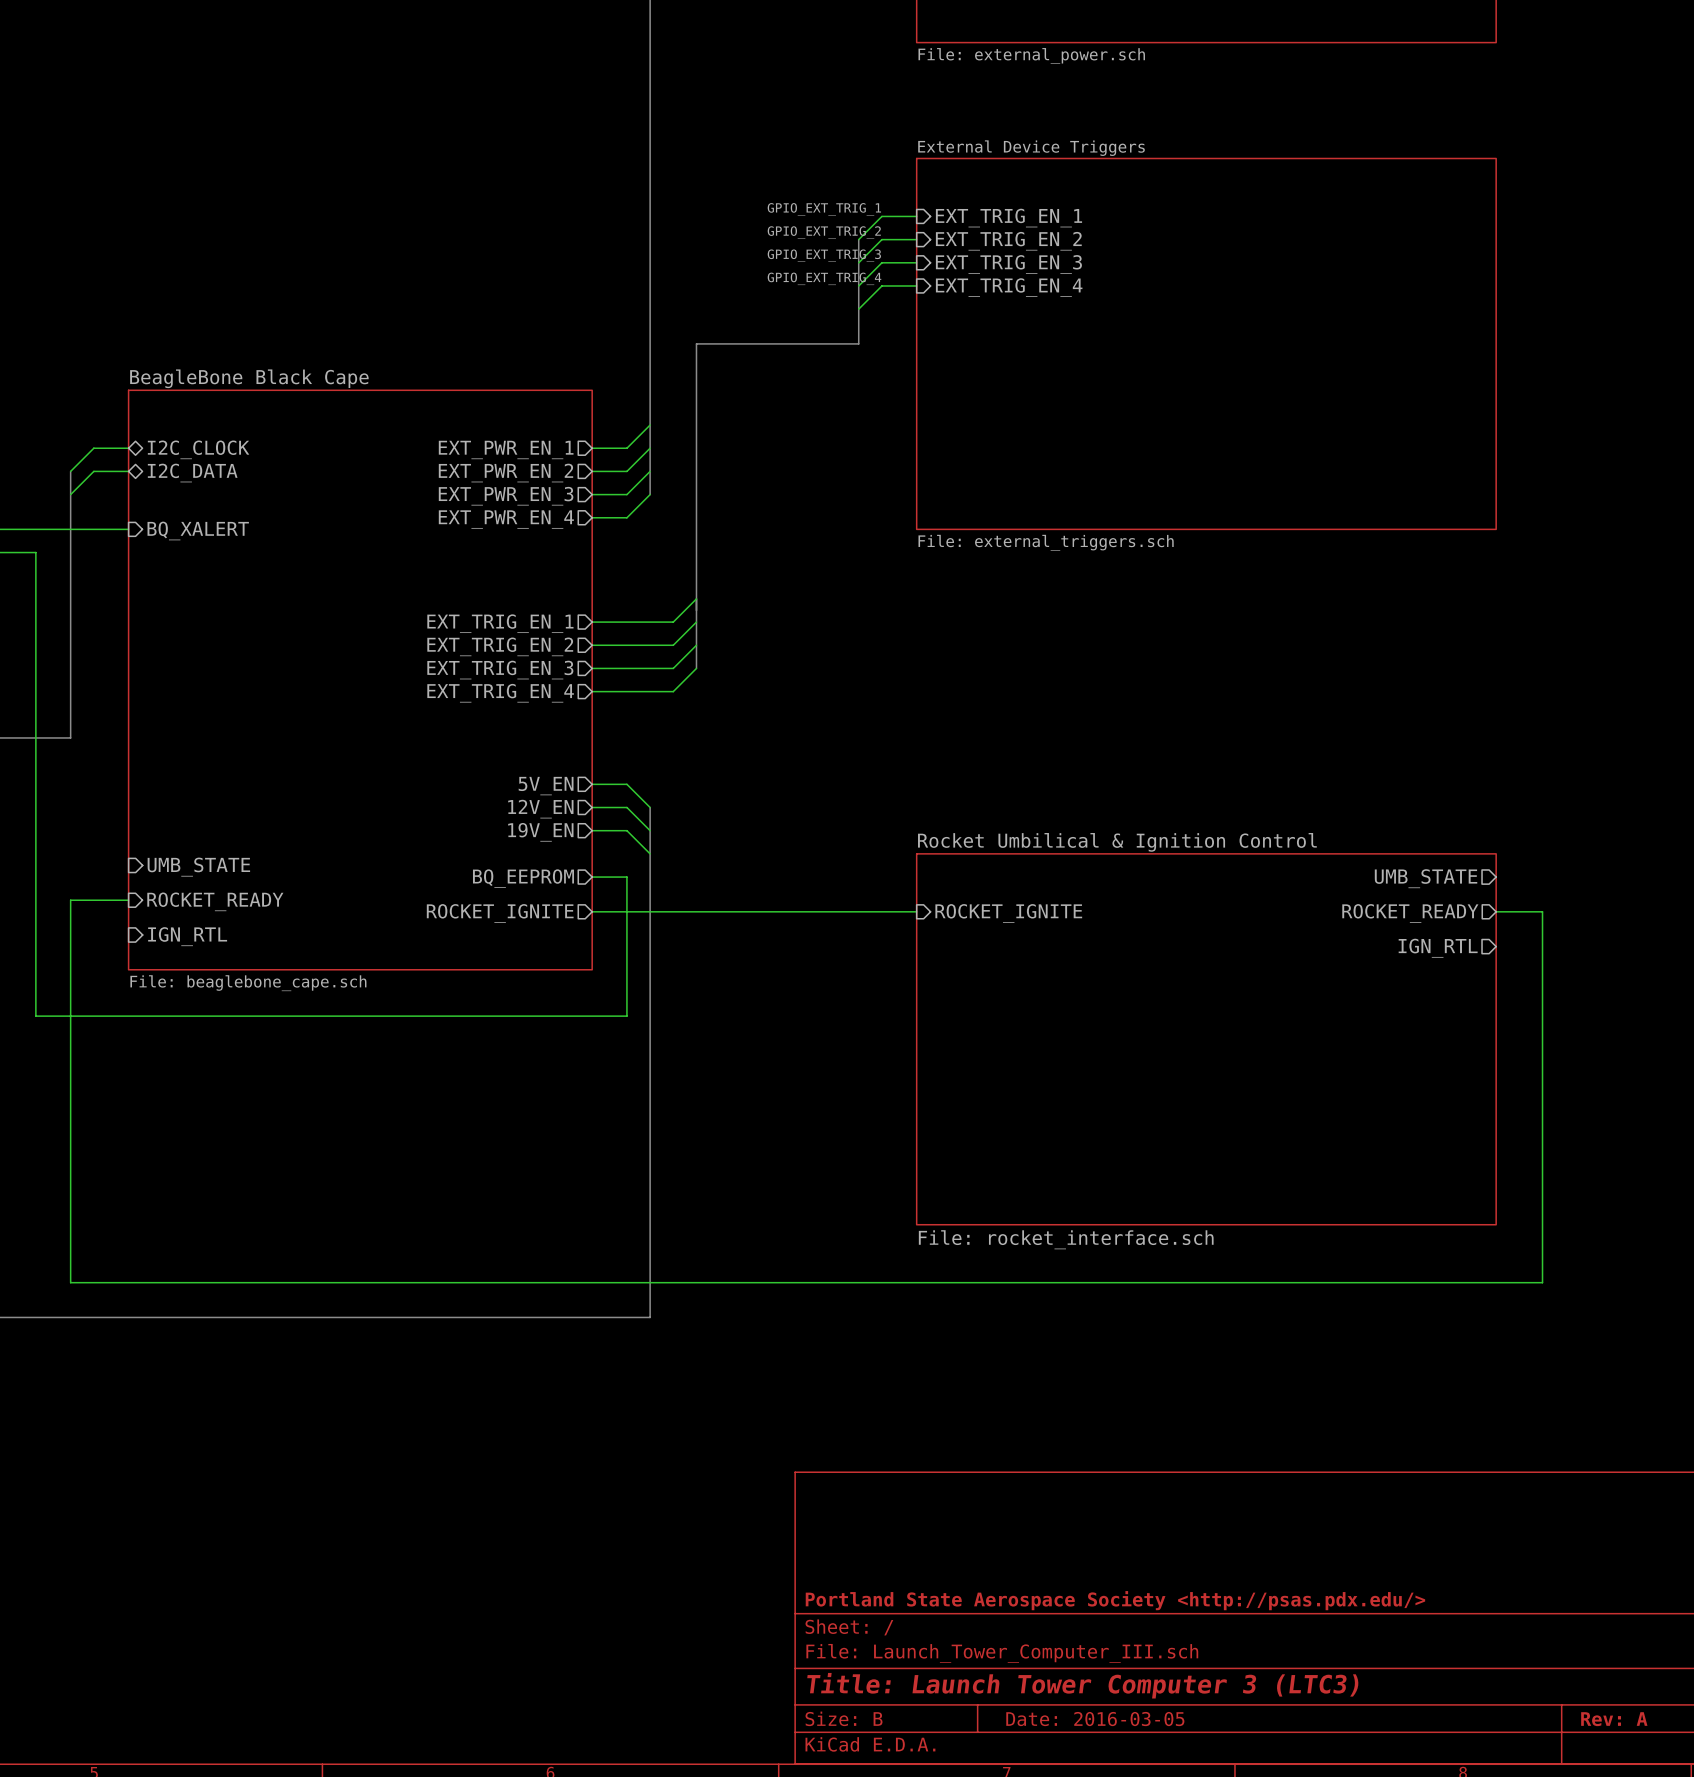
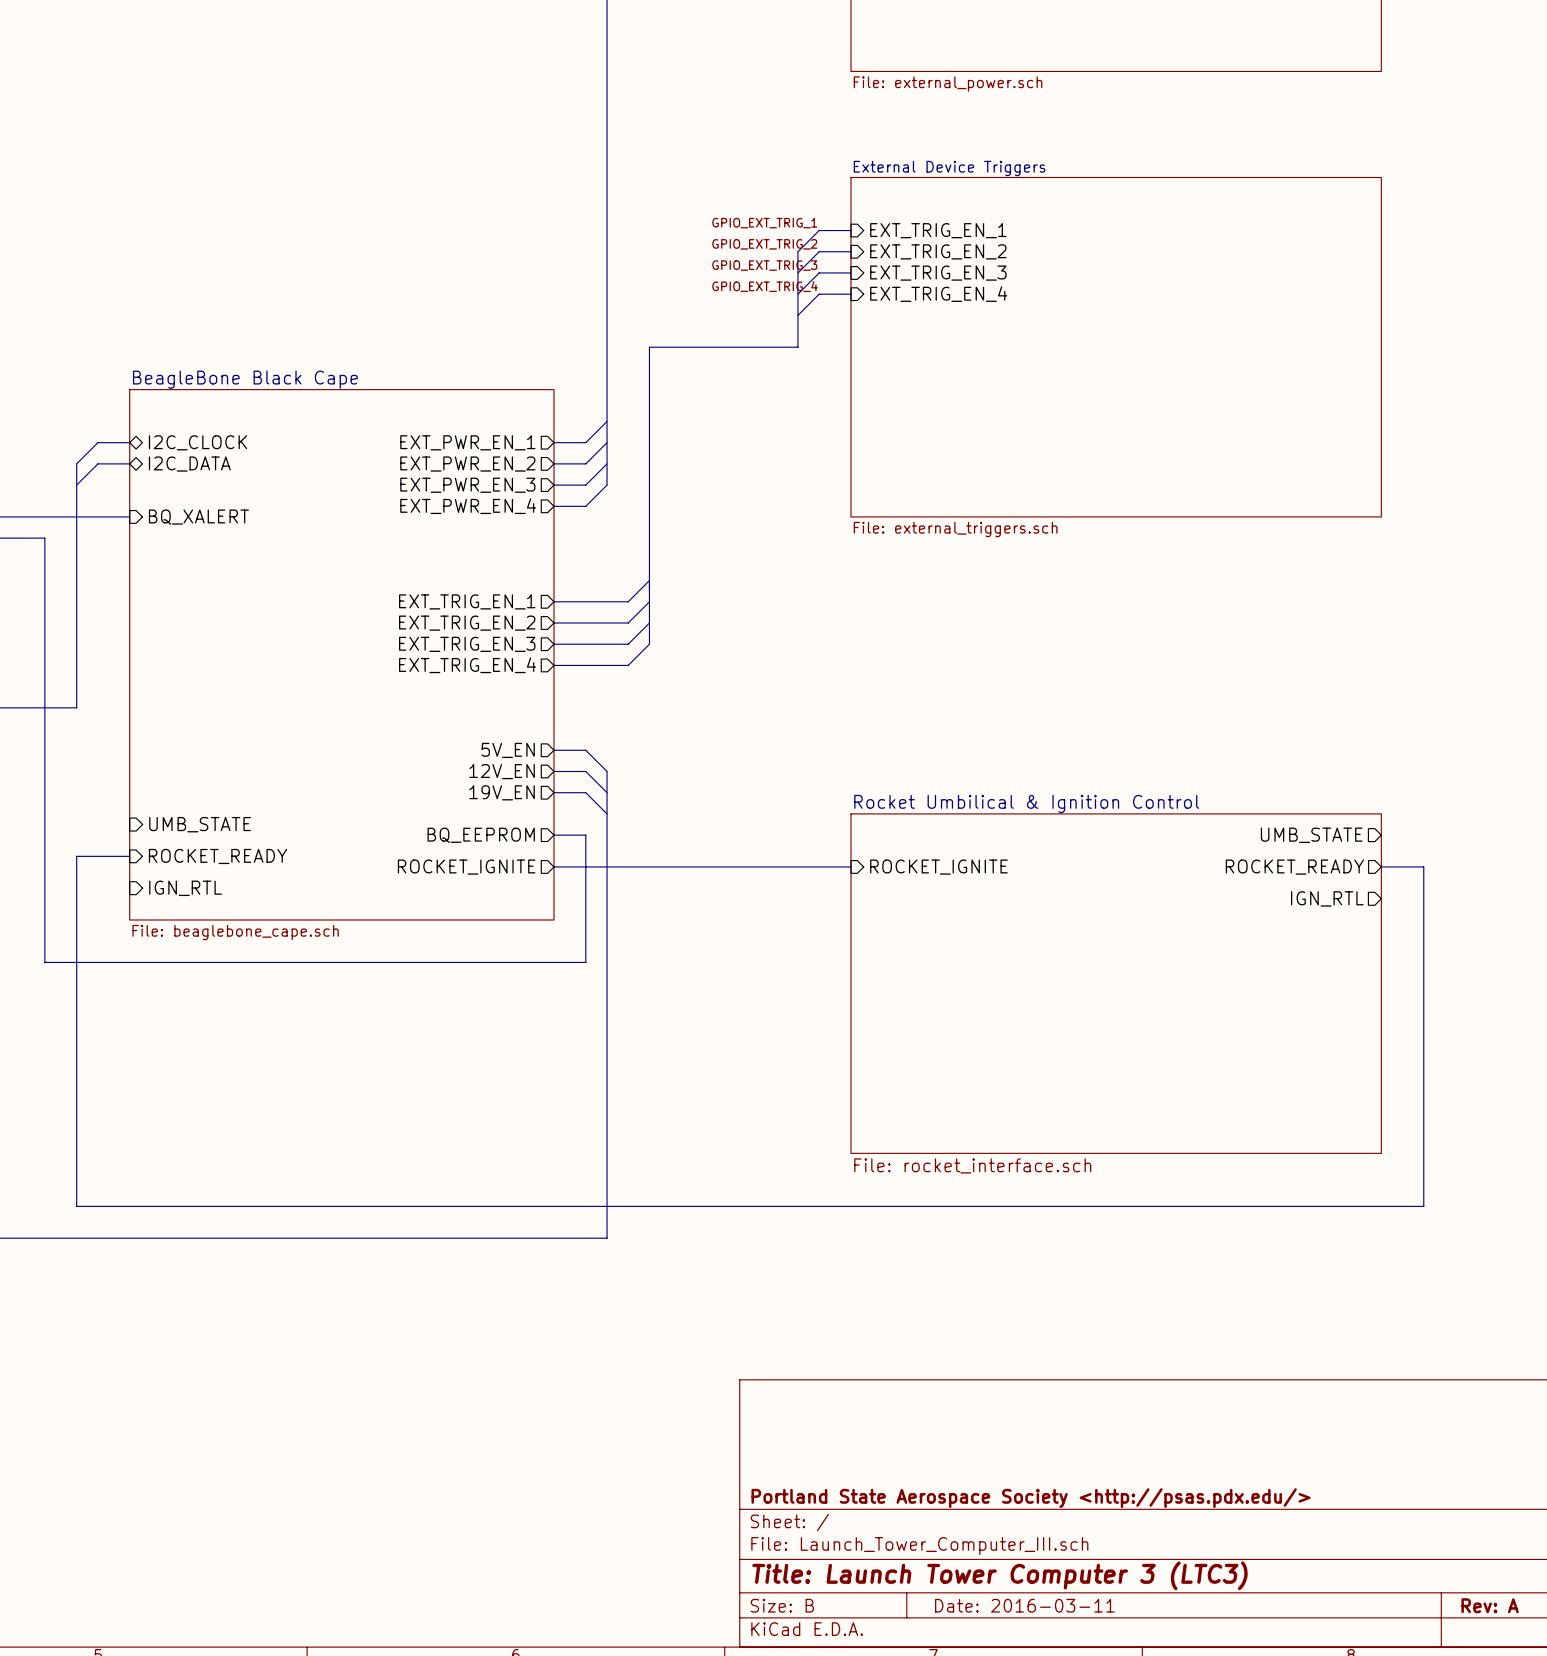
title block: Date: 2016-03-05 (1095, 1719) -> Date: 2016-03-11 (1024, 1605)

